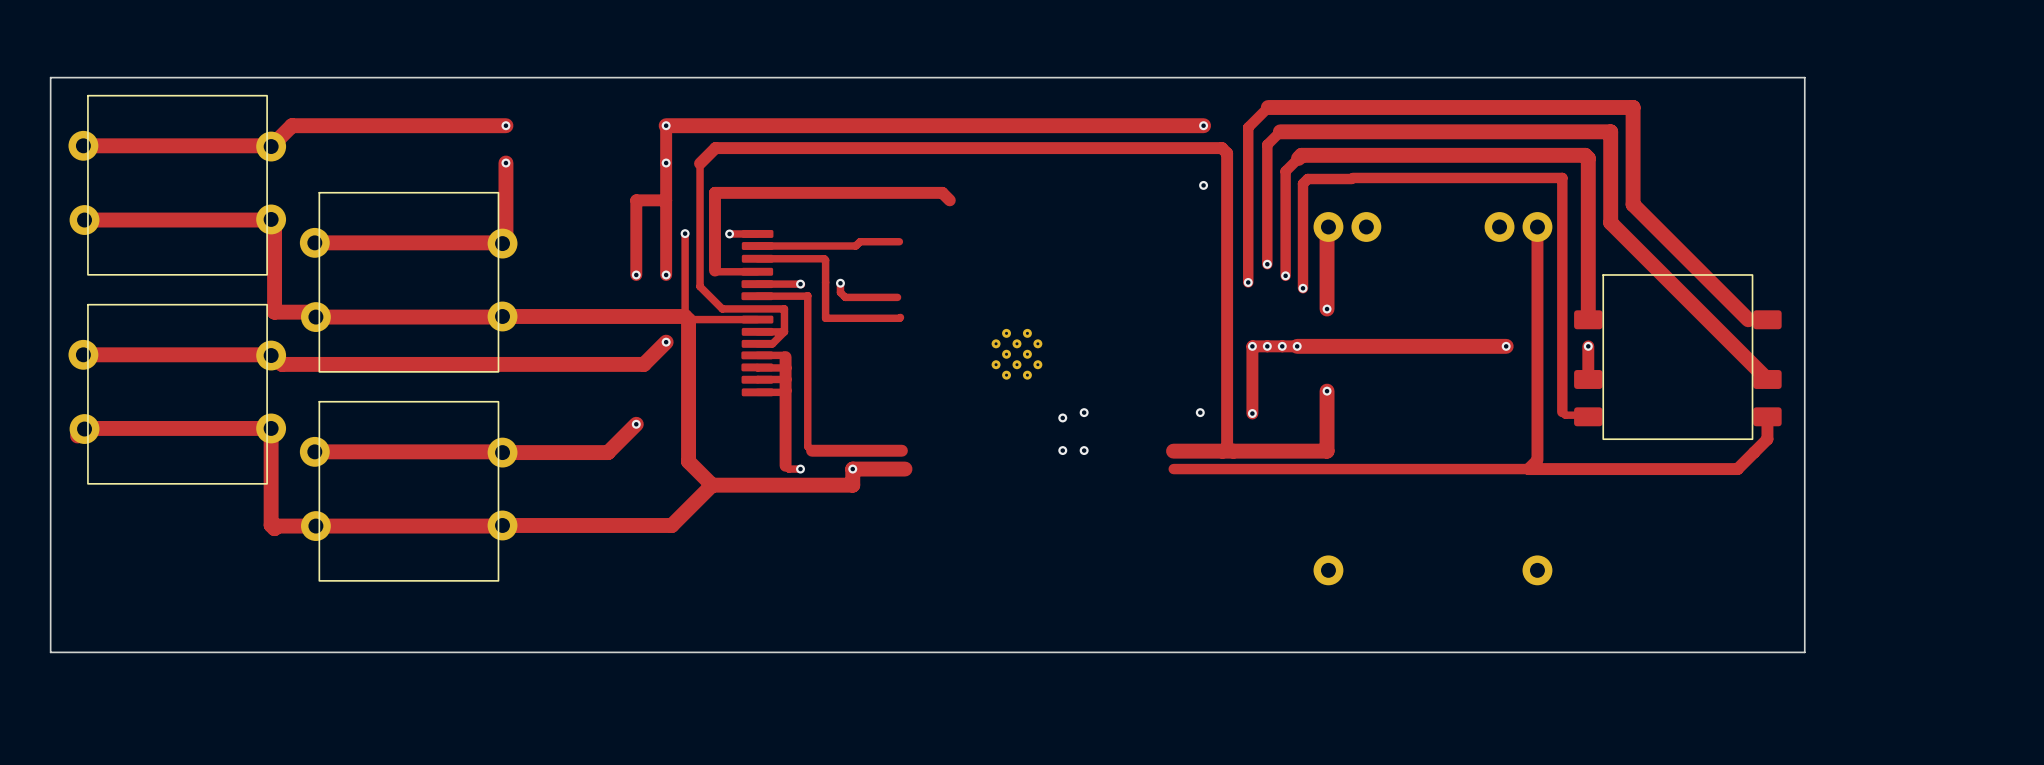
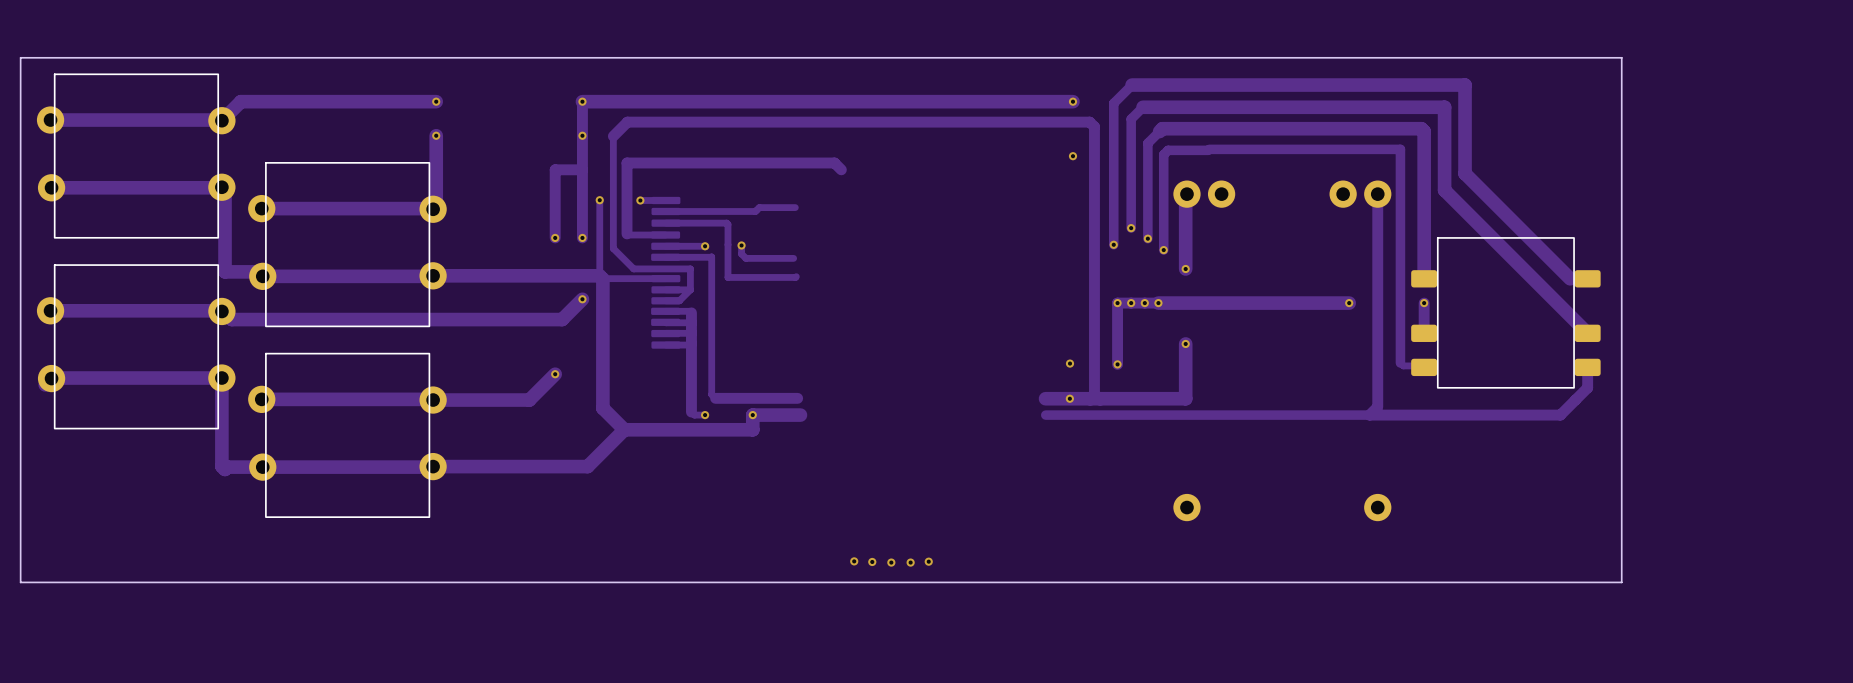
part: (1016, 354) -> none
via: (1084, 412) -> none
via: (1062, 417) -> none
via: (1062, 450) -> none
via: (1084, 450) -> none
via: none -> (1069, 398)
via: none -> (854, 561)
via: none -> (872, 561)
via: none -> (928, 561)
via: none -> (891, 562)
via: none -> (910, 562)

